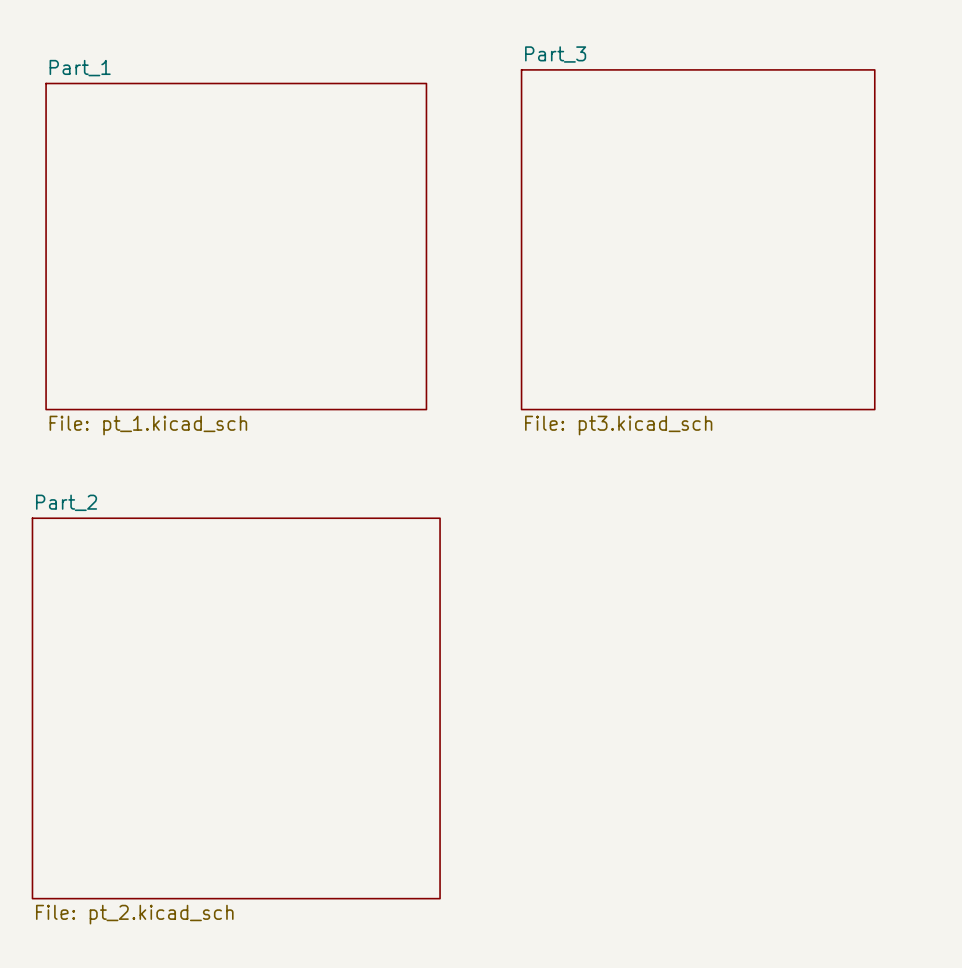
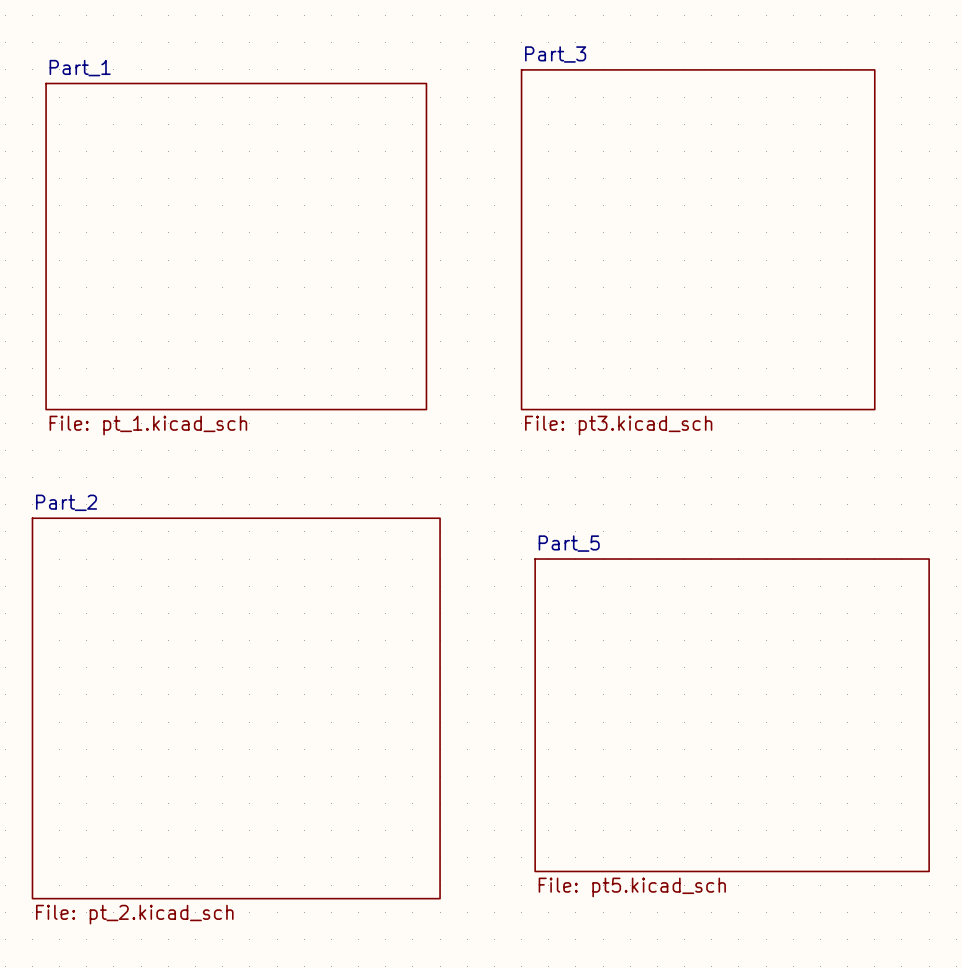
sheet Part_5: none -> File: pt5.kicad_sch (732, 715)

